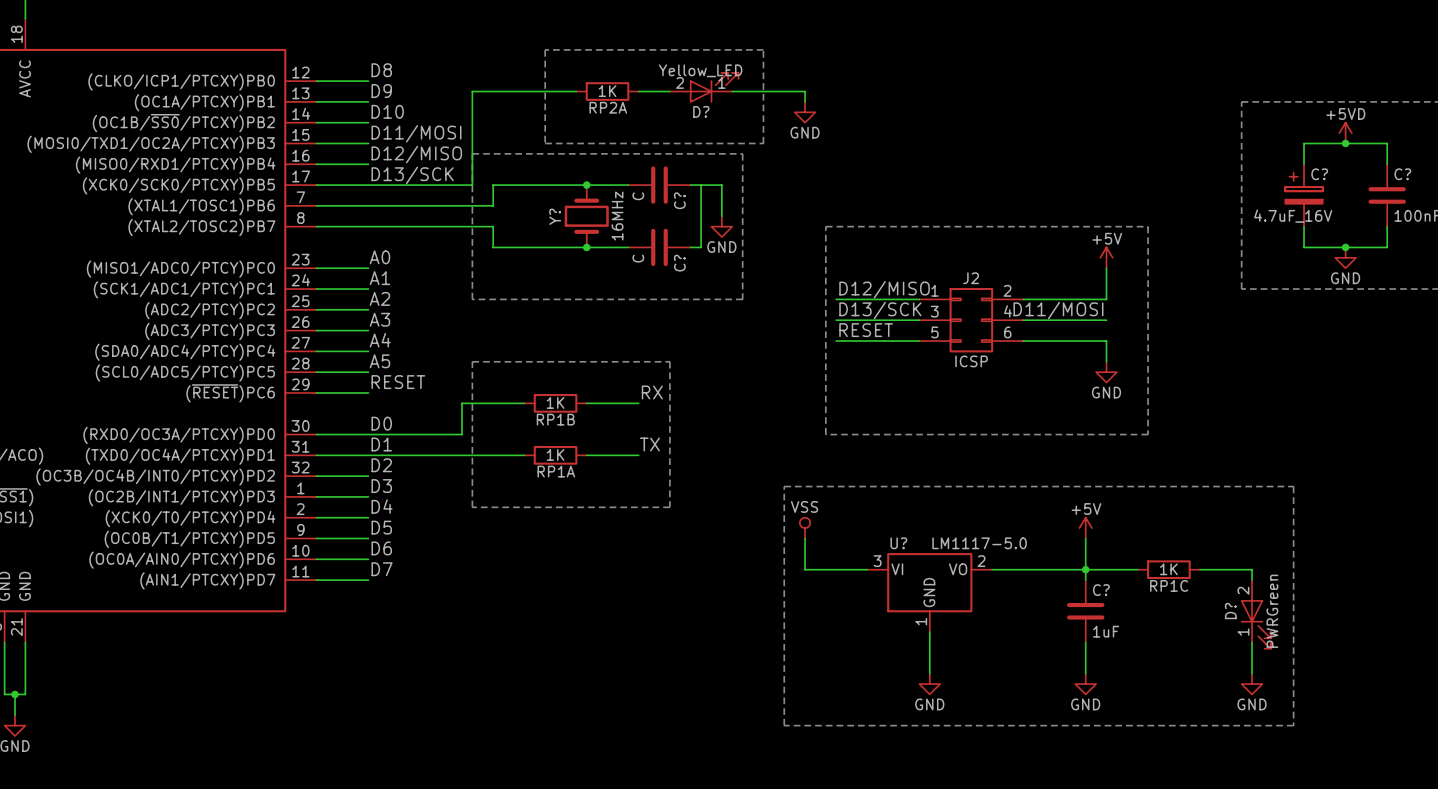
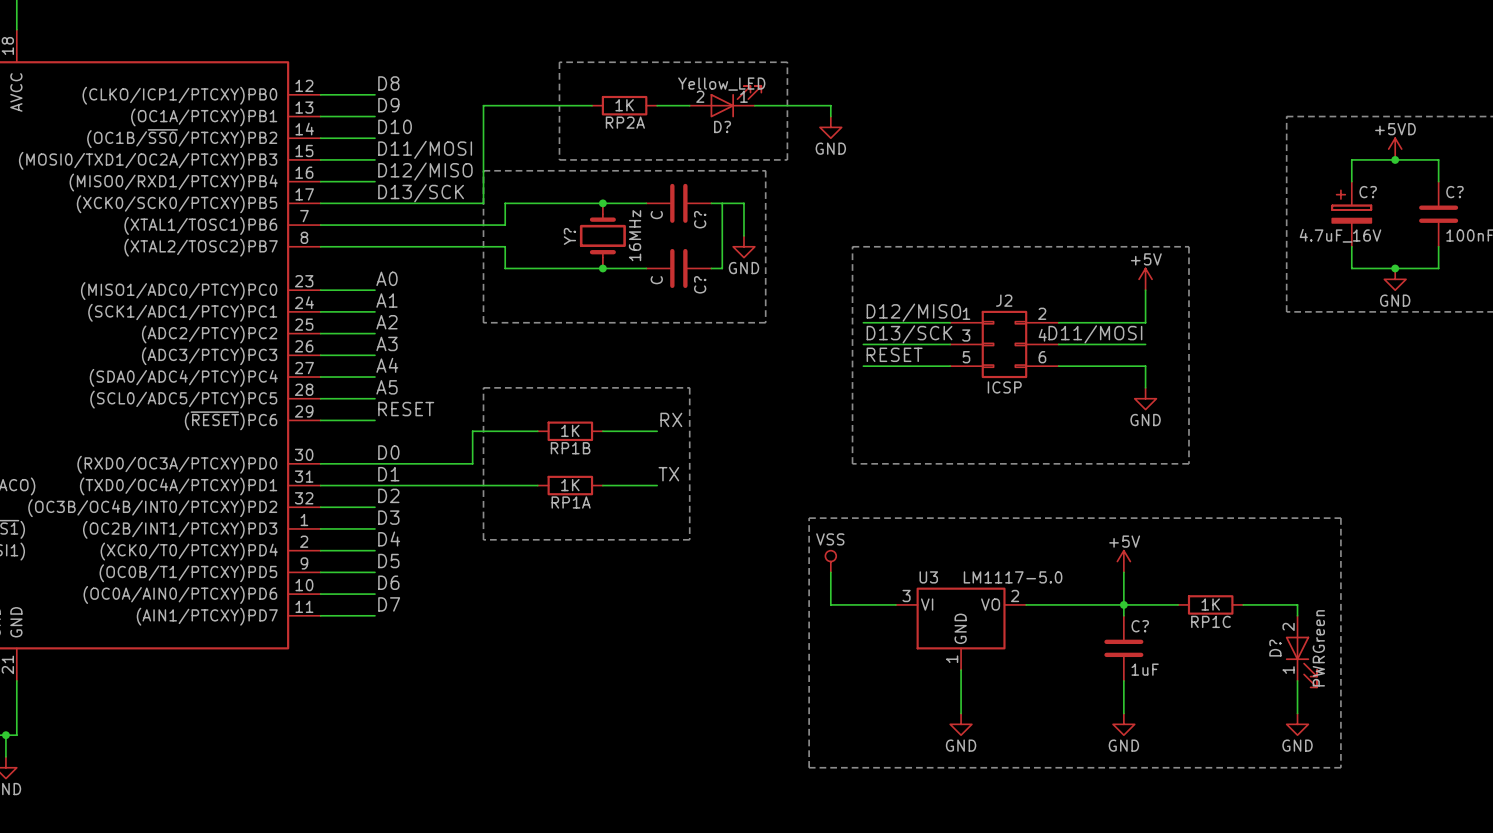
U? name: U? (898, 543) -> U3 (928, 577)

